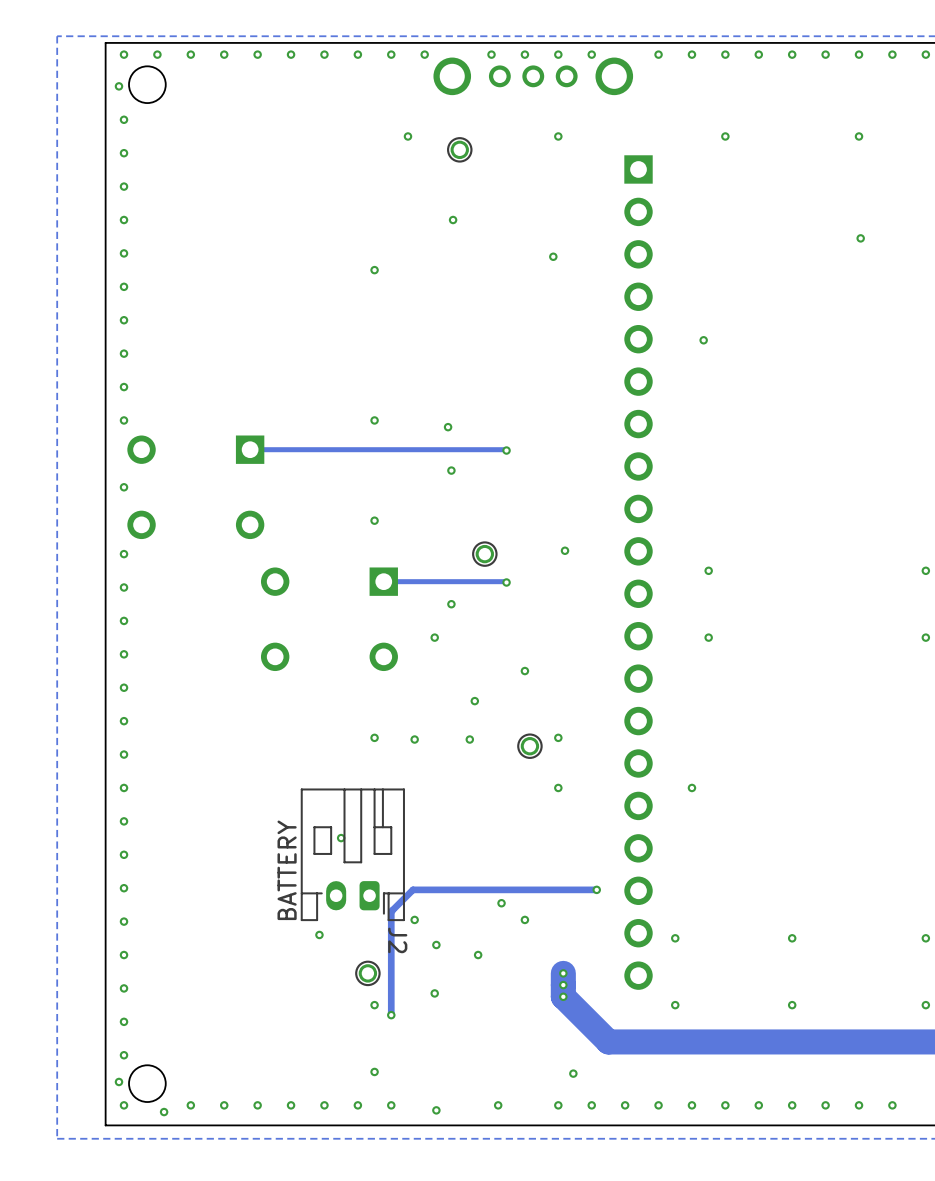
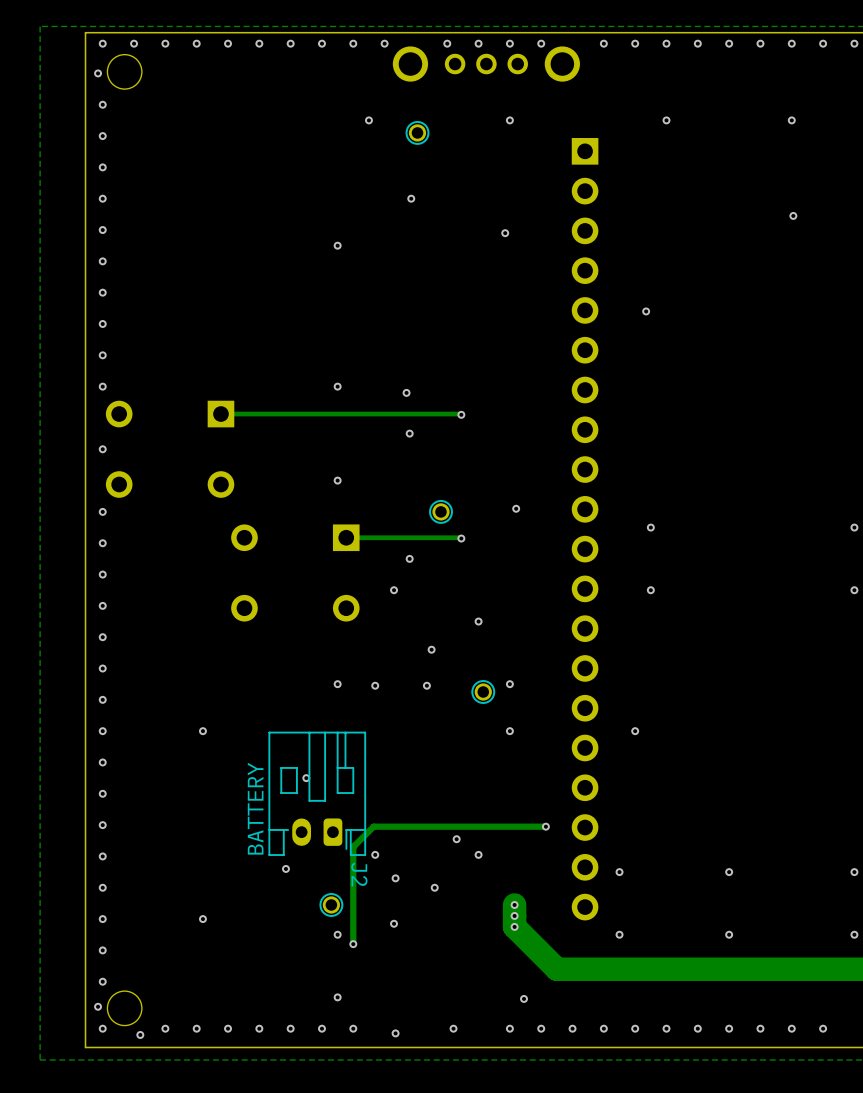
via: none -> (202, 731)
via: none -> (202, 919)

